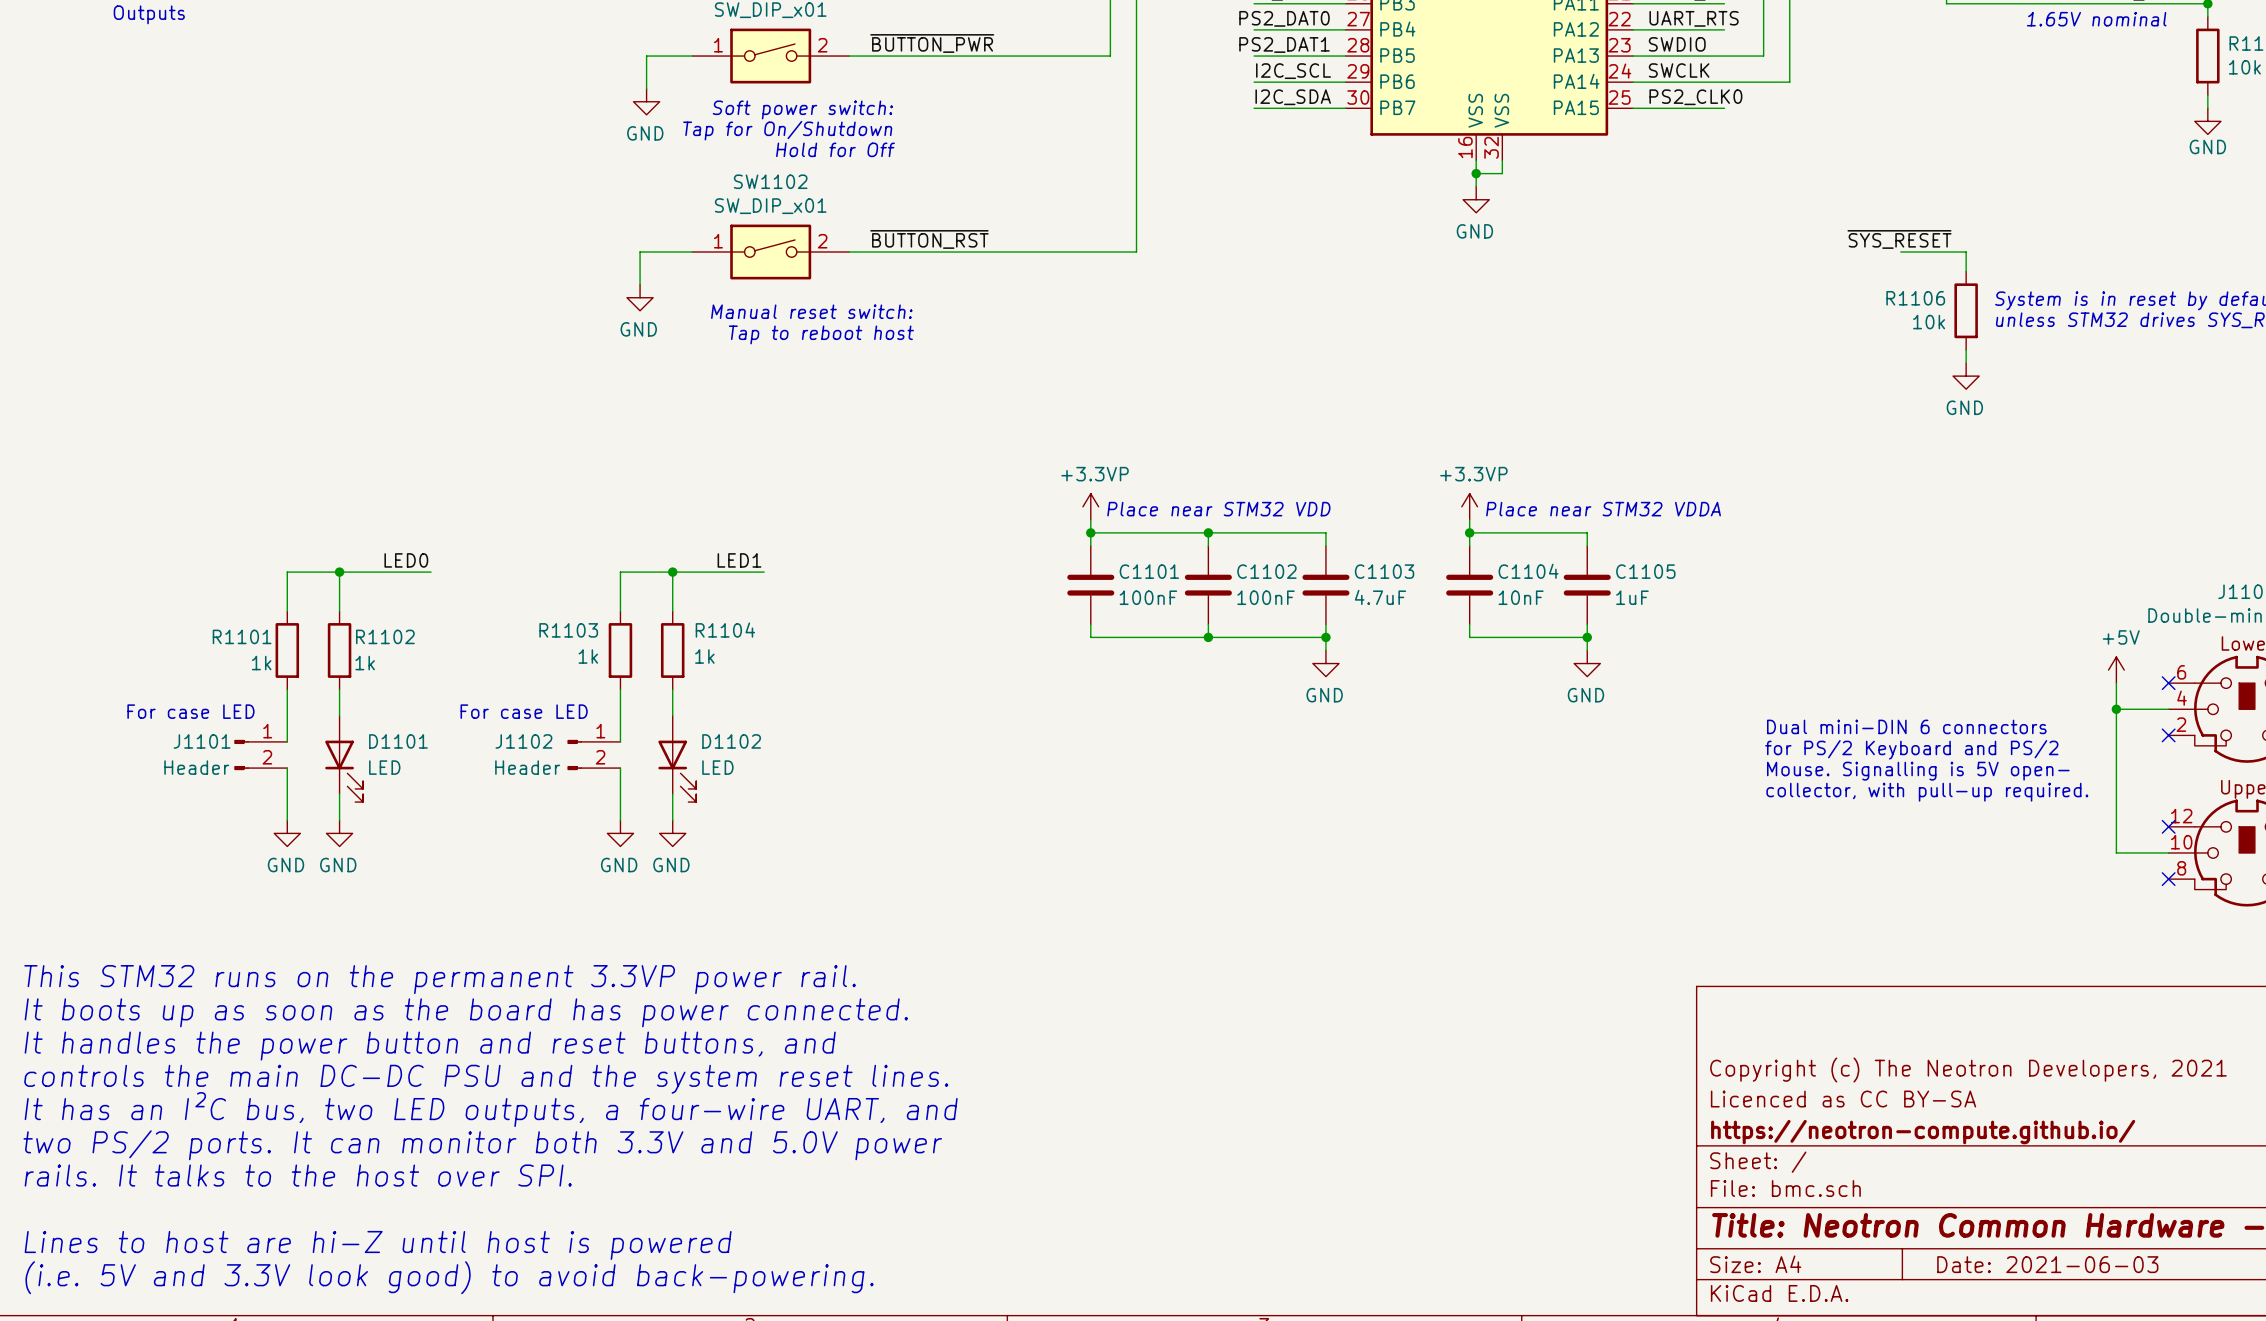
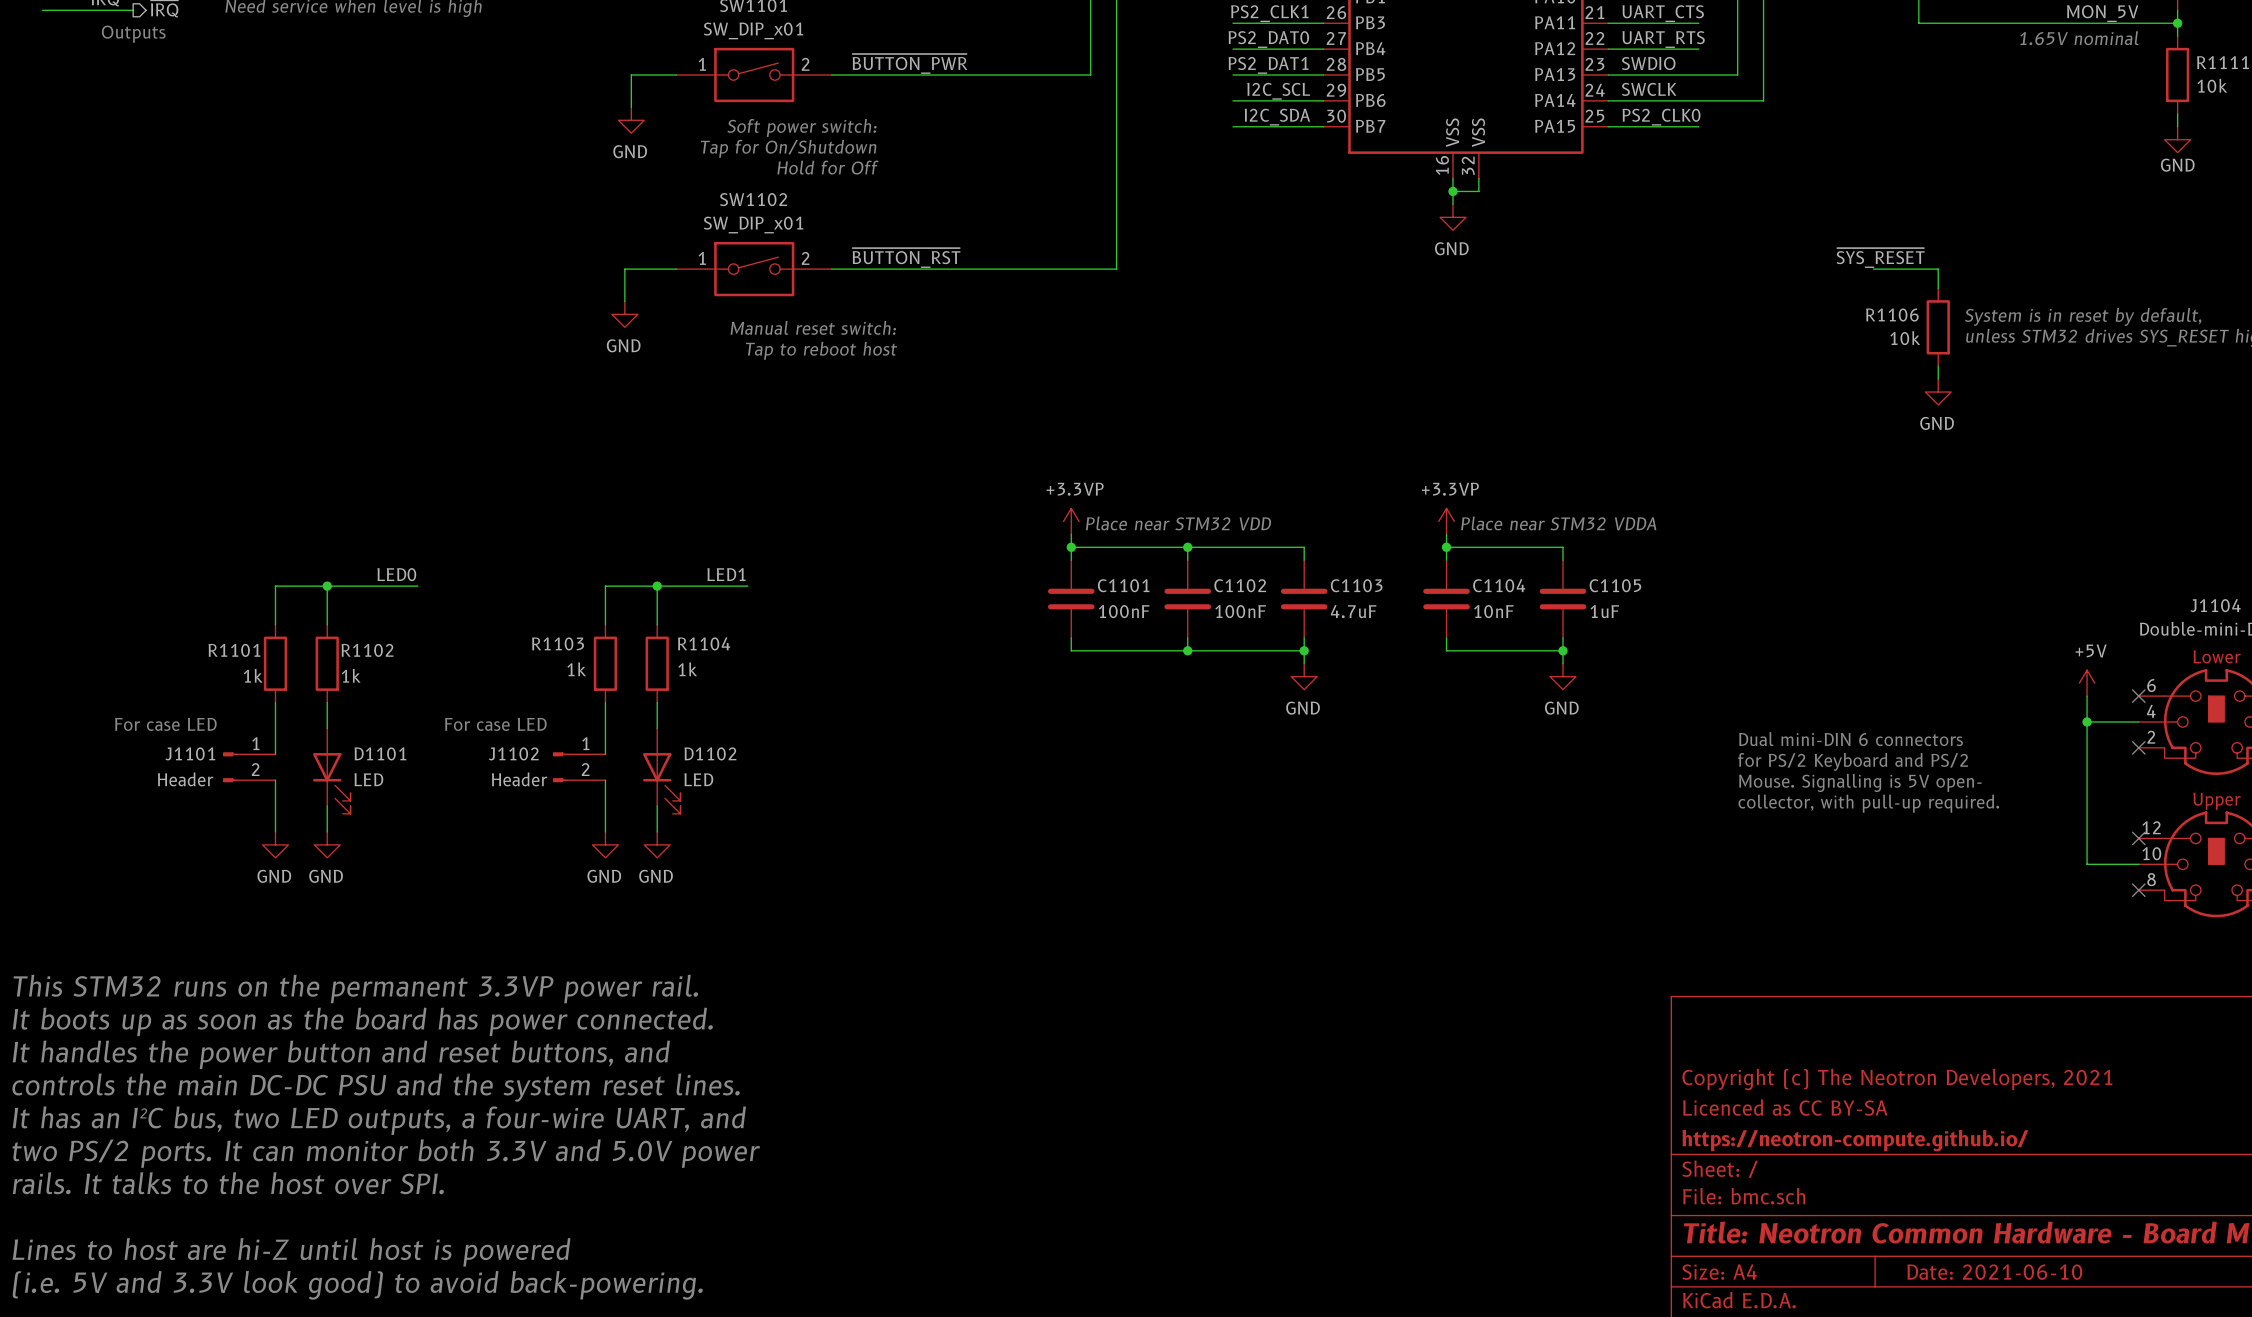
title block: Date: 2021-06-03 (2047, 1264) -> Date: 2021-06-10 (1994, 1272)

